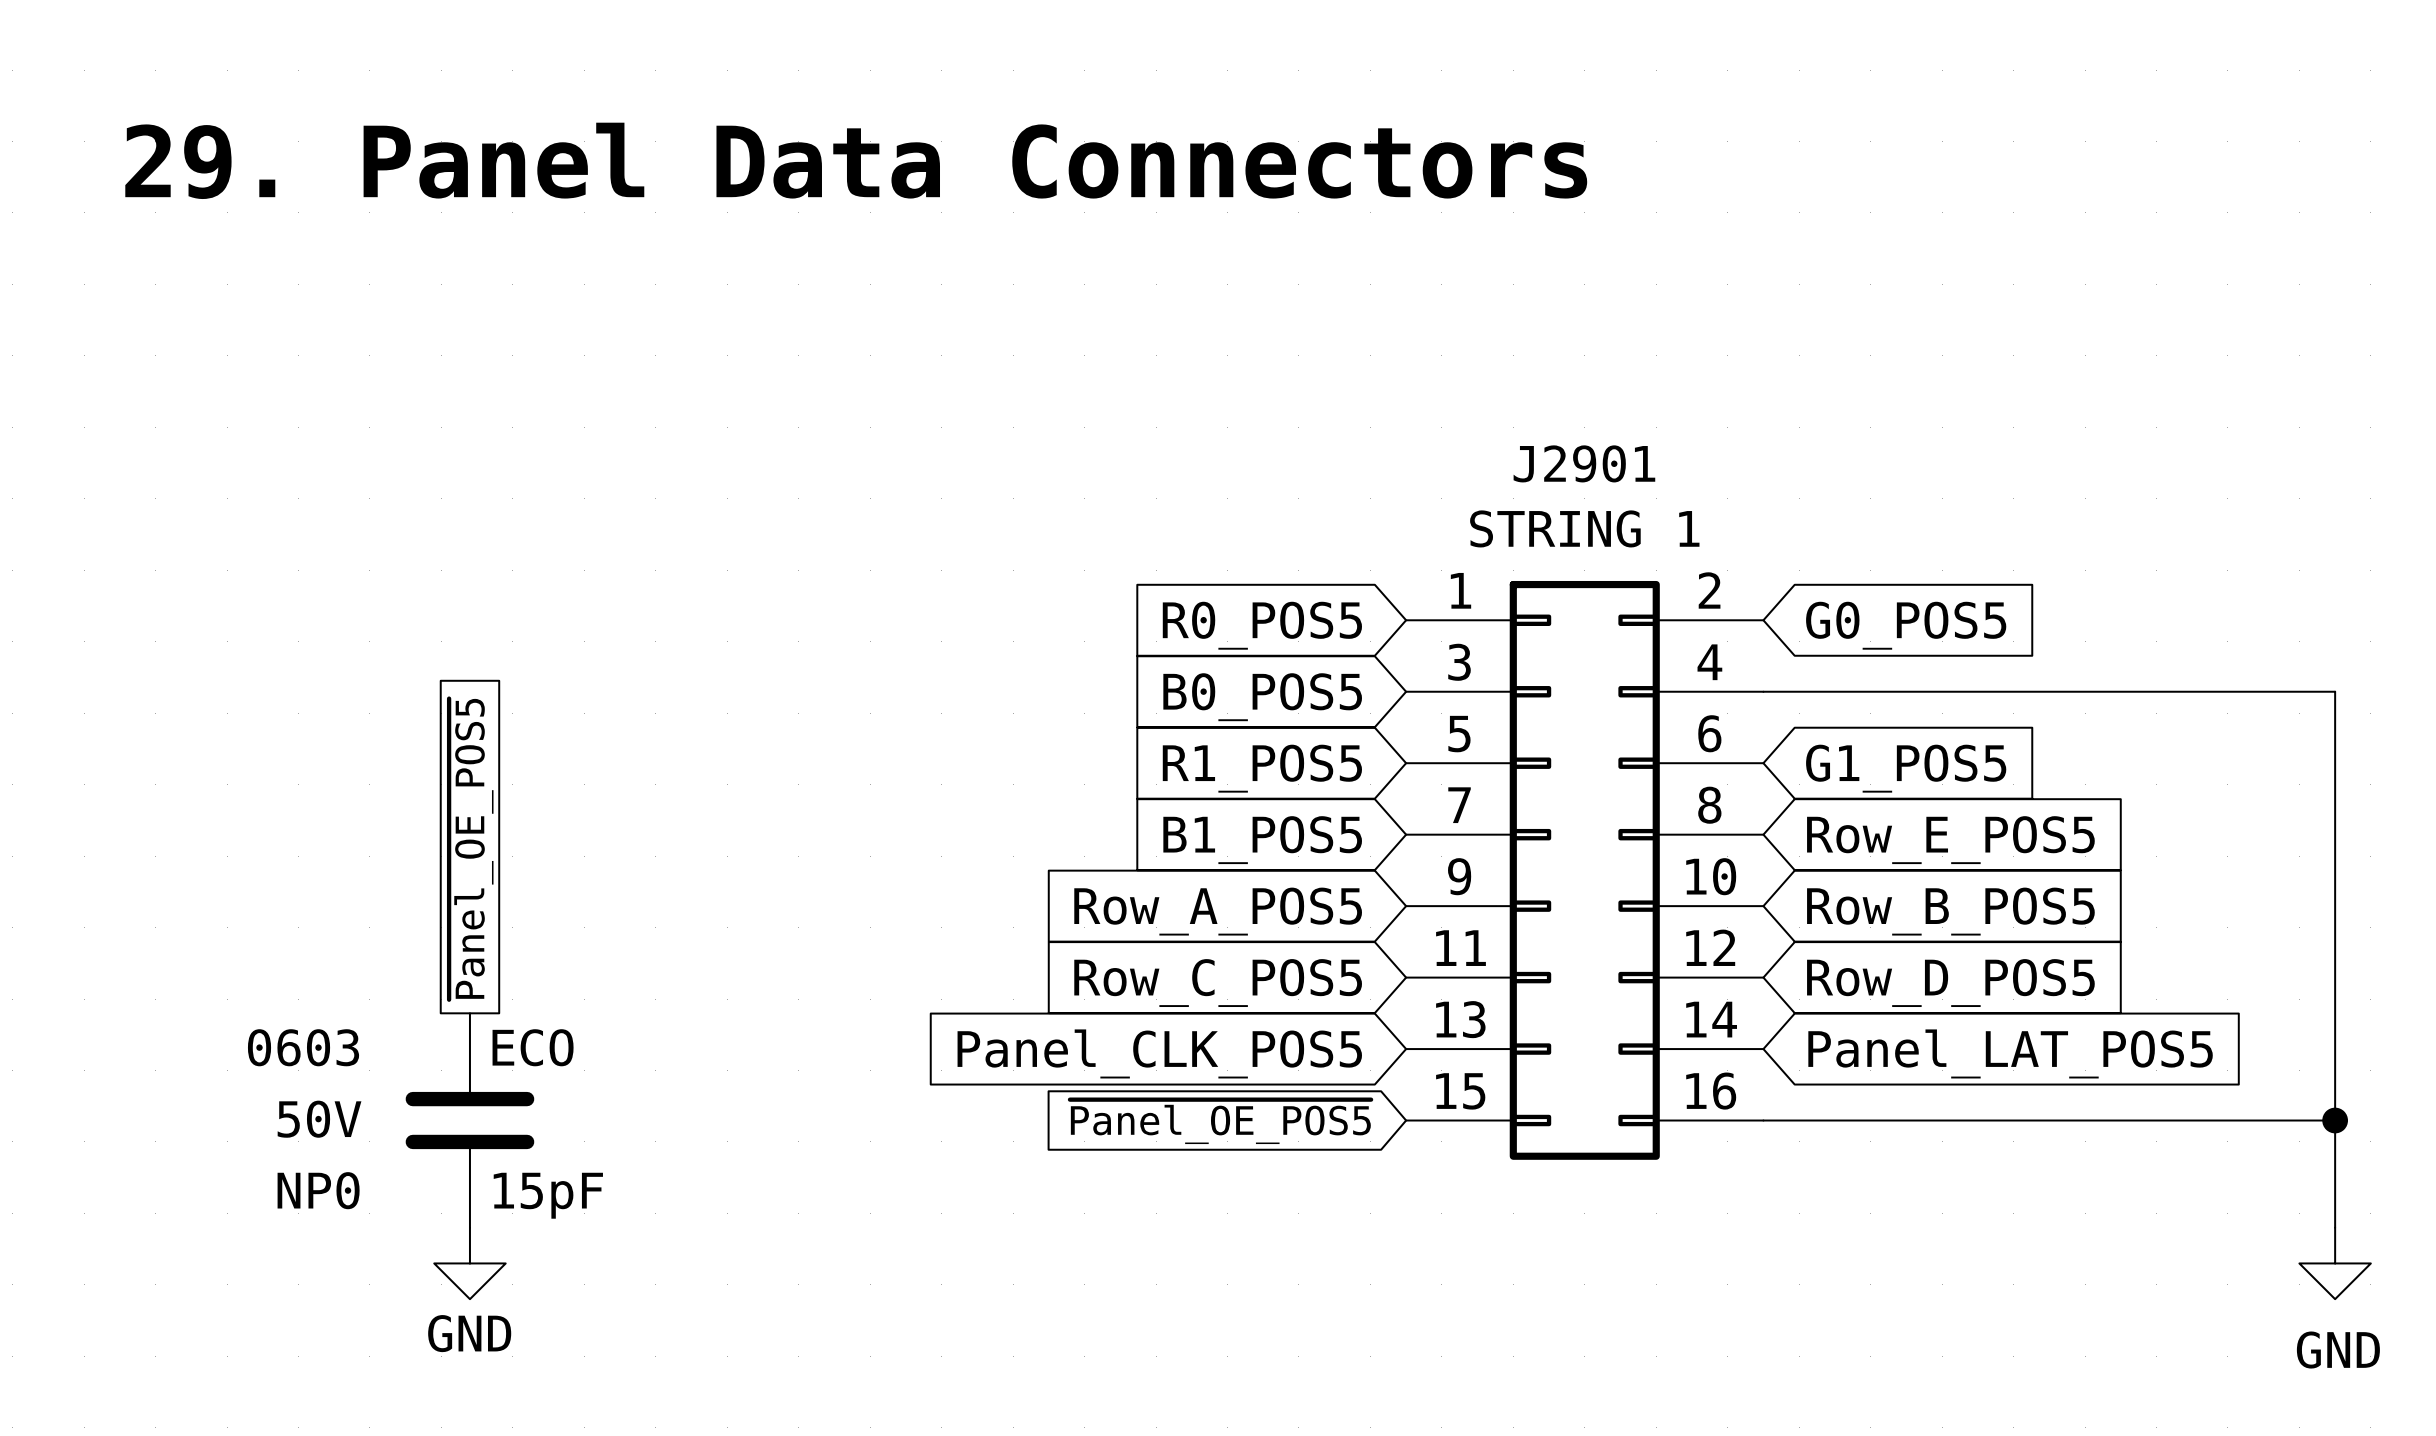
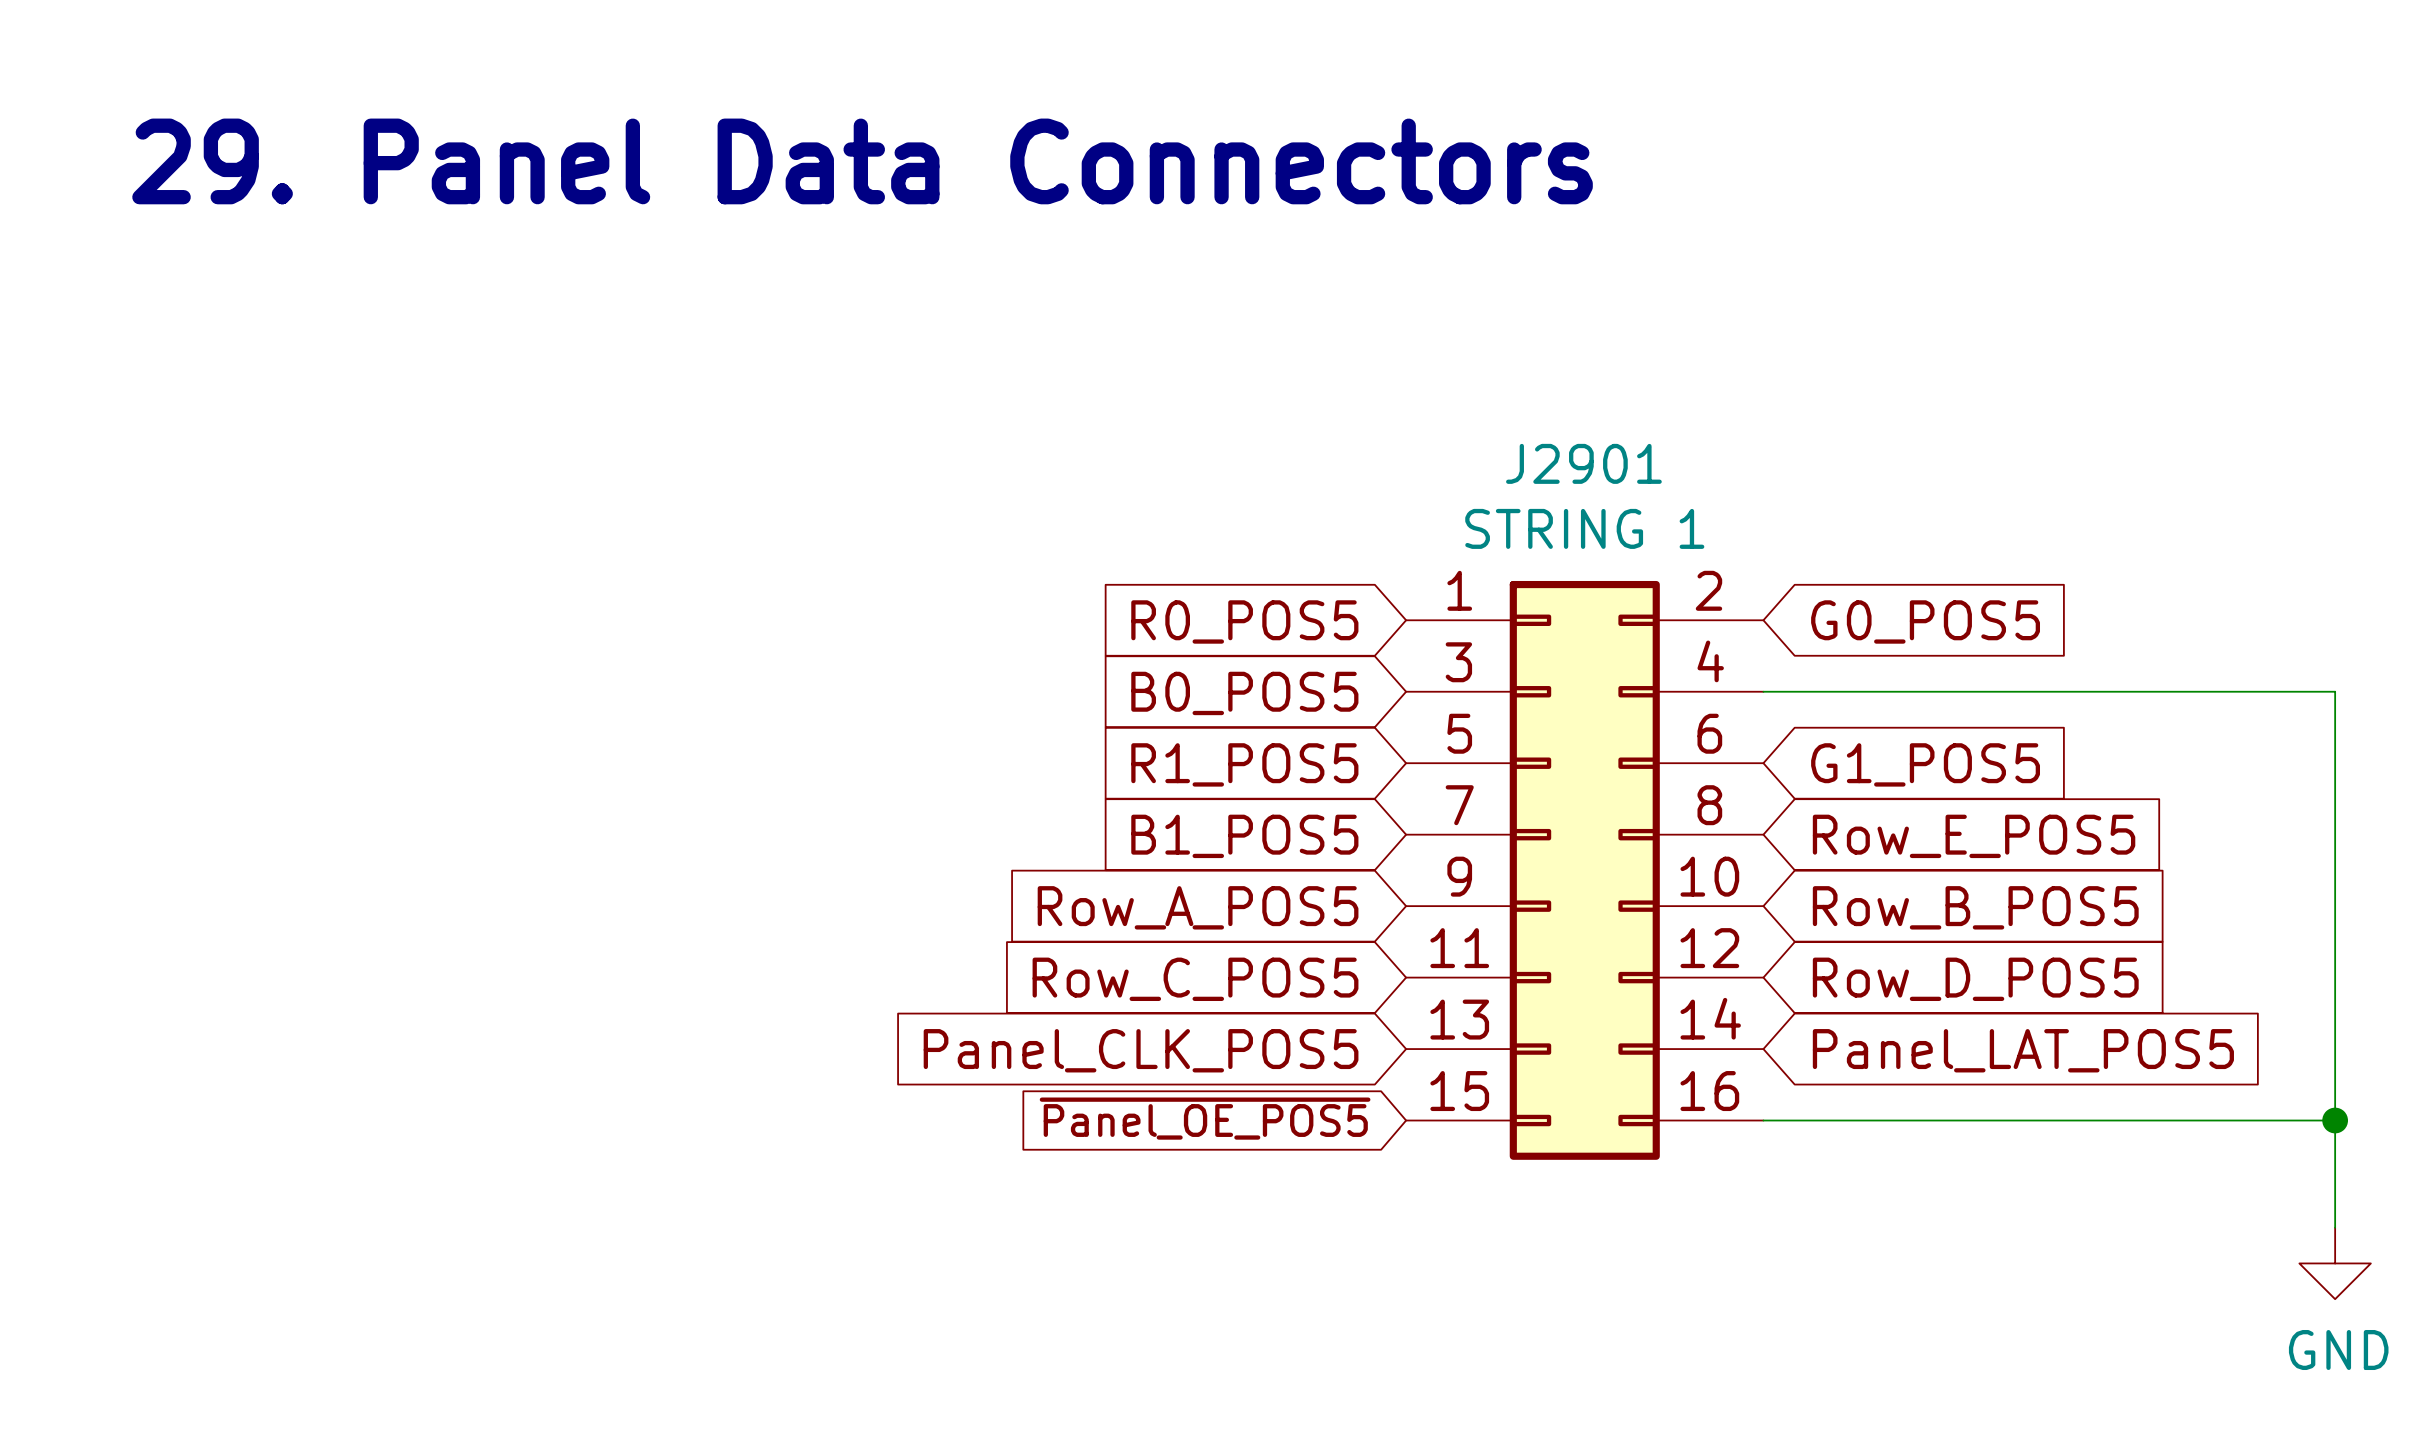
global label: ~{Panel_OE_POS5} (471, 849) -> none
ECO: 15pF (469, 1120) -> none
power symbol: GND (469, 1263) -> none

